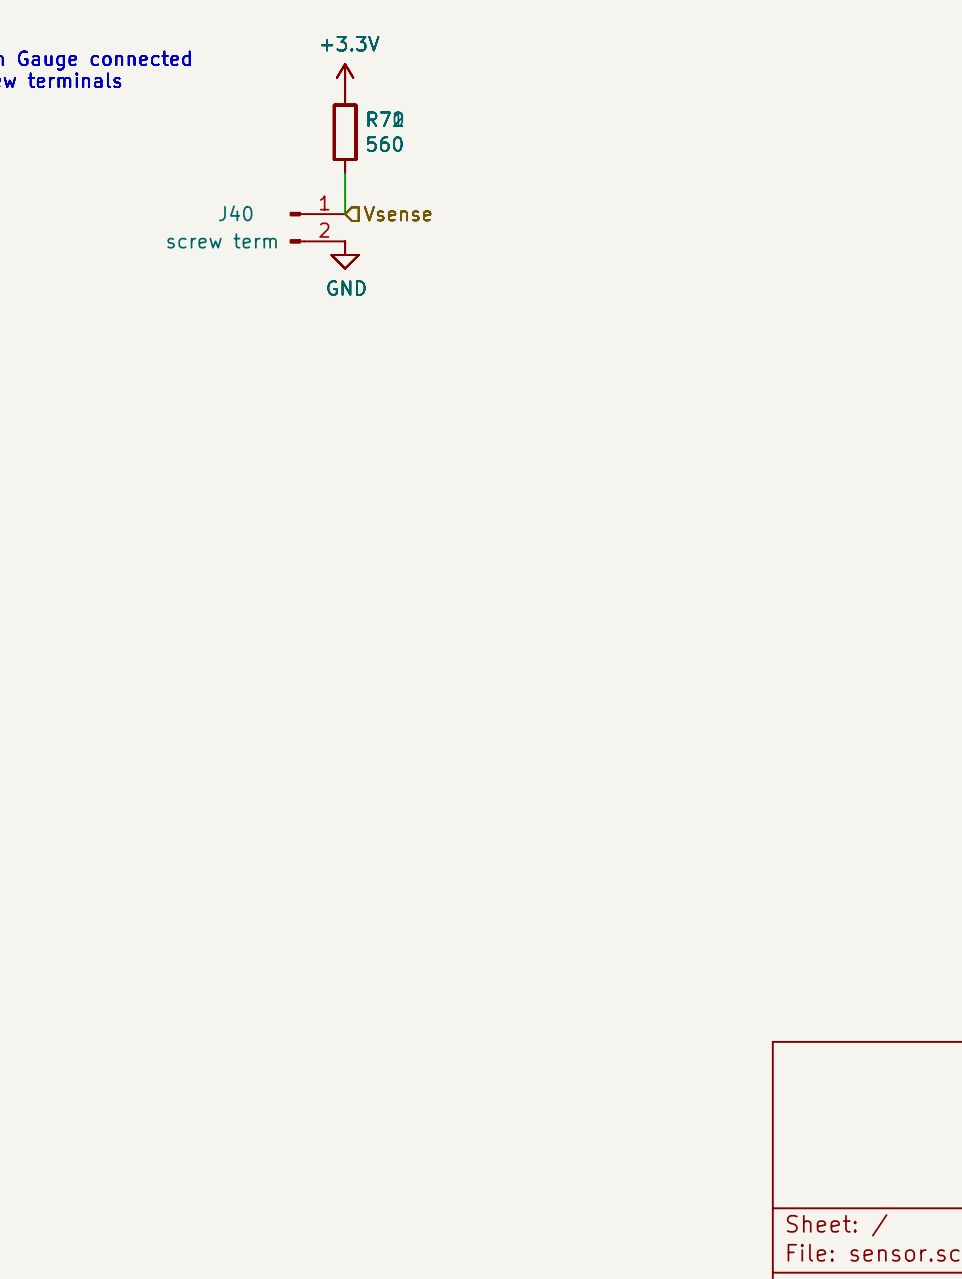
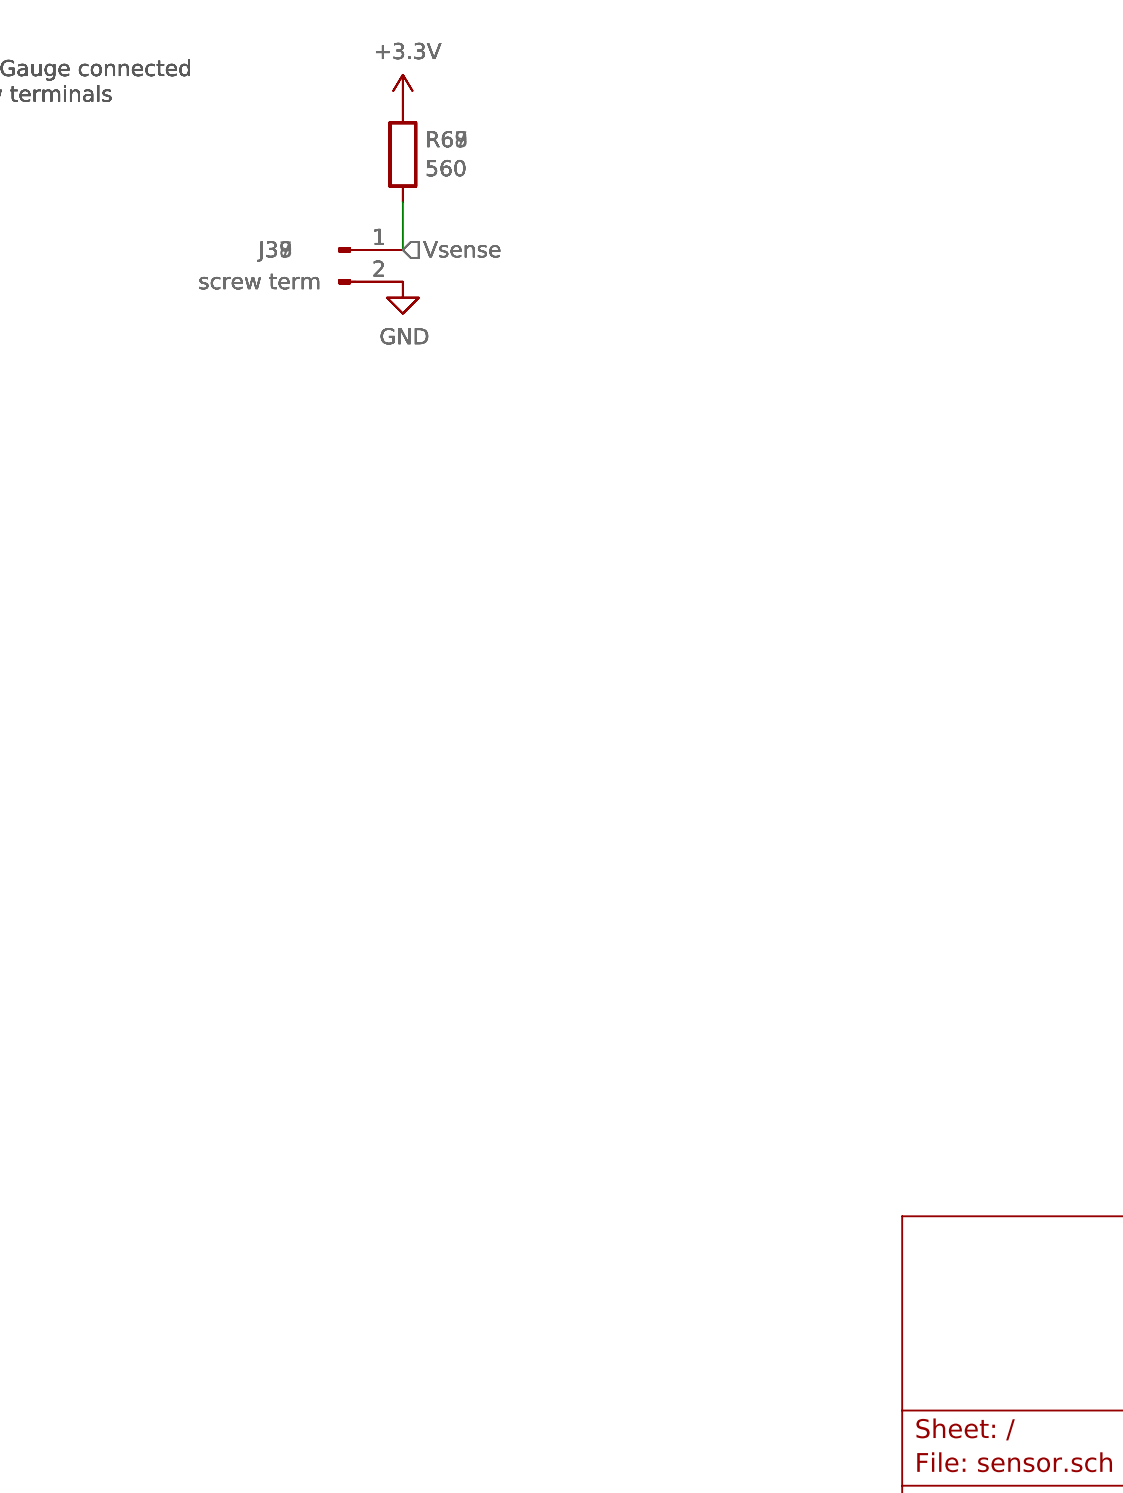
part: 560 (345, 132) -> none
part: 560 (345, 132) -> none
part: 560 (345, 132) -> none
part: none -> 560 (402, 154)
part: none -> 560 (402, 154)
part: none -> 560 (402, 154)
J40: screw term (317, 227) -> none
part: none -> screw term (370, 265)
part: none -> screw term (370, 265)
part: none -> screw term (370, 265)

